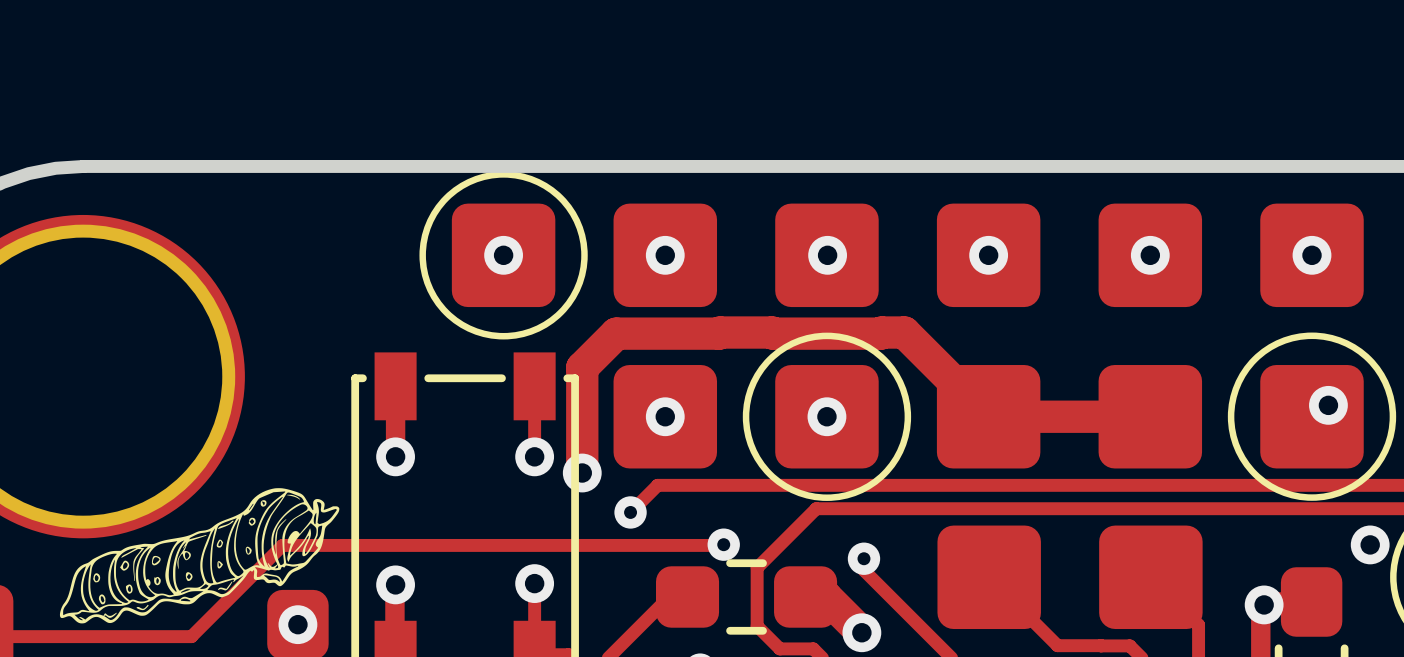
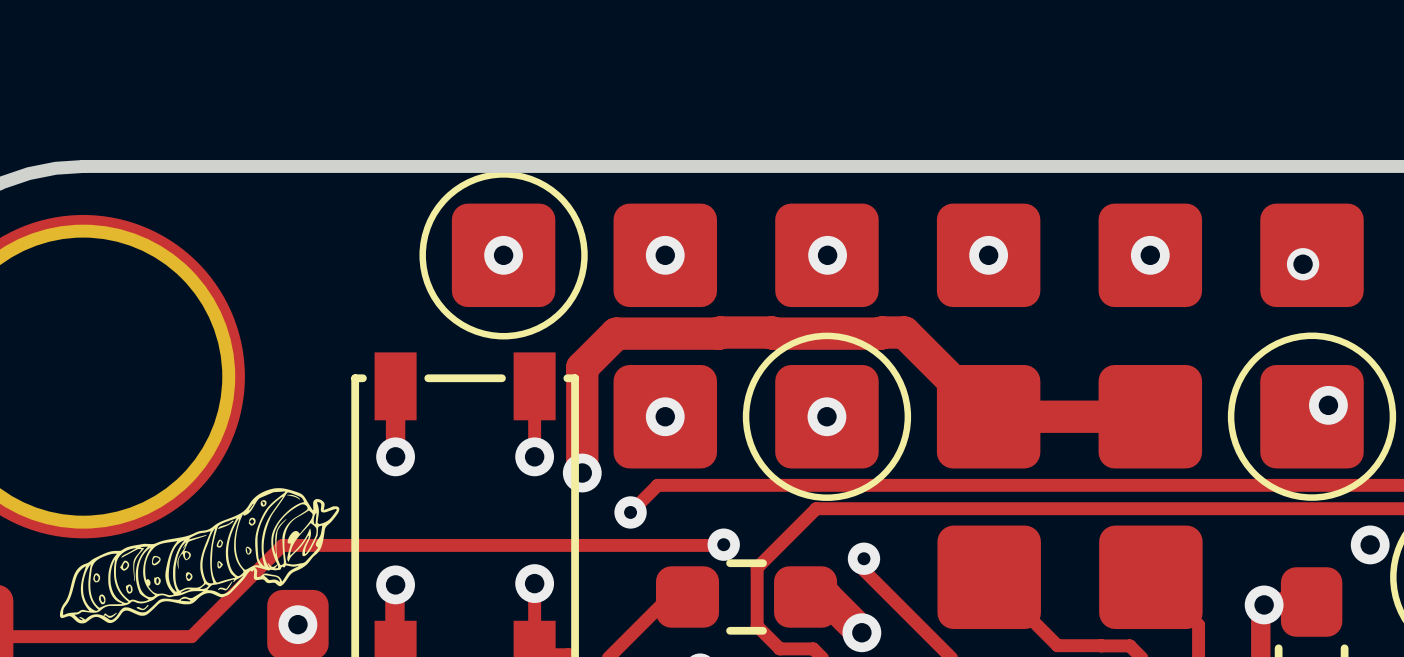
via size: [1292, 235, 1332, 275] -> [1286, 248, 1320, 281]

